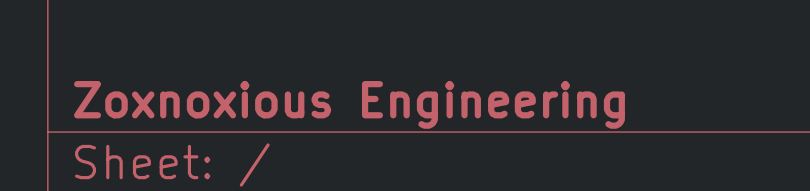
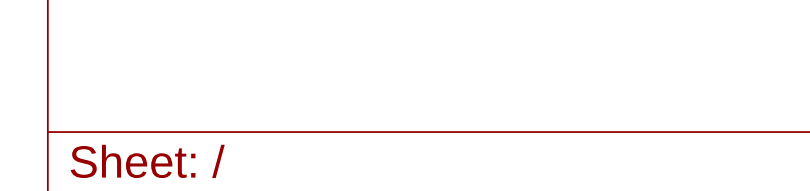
title block: Zoxnoxious Engineering (349, 104) -> none

